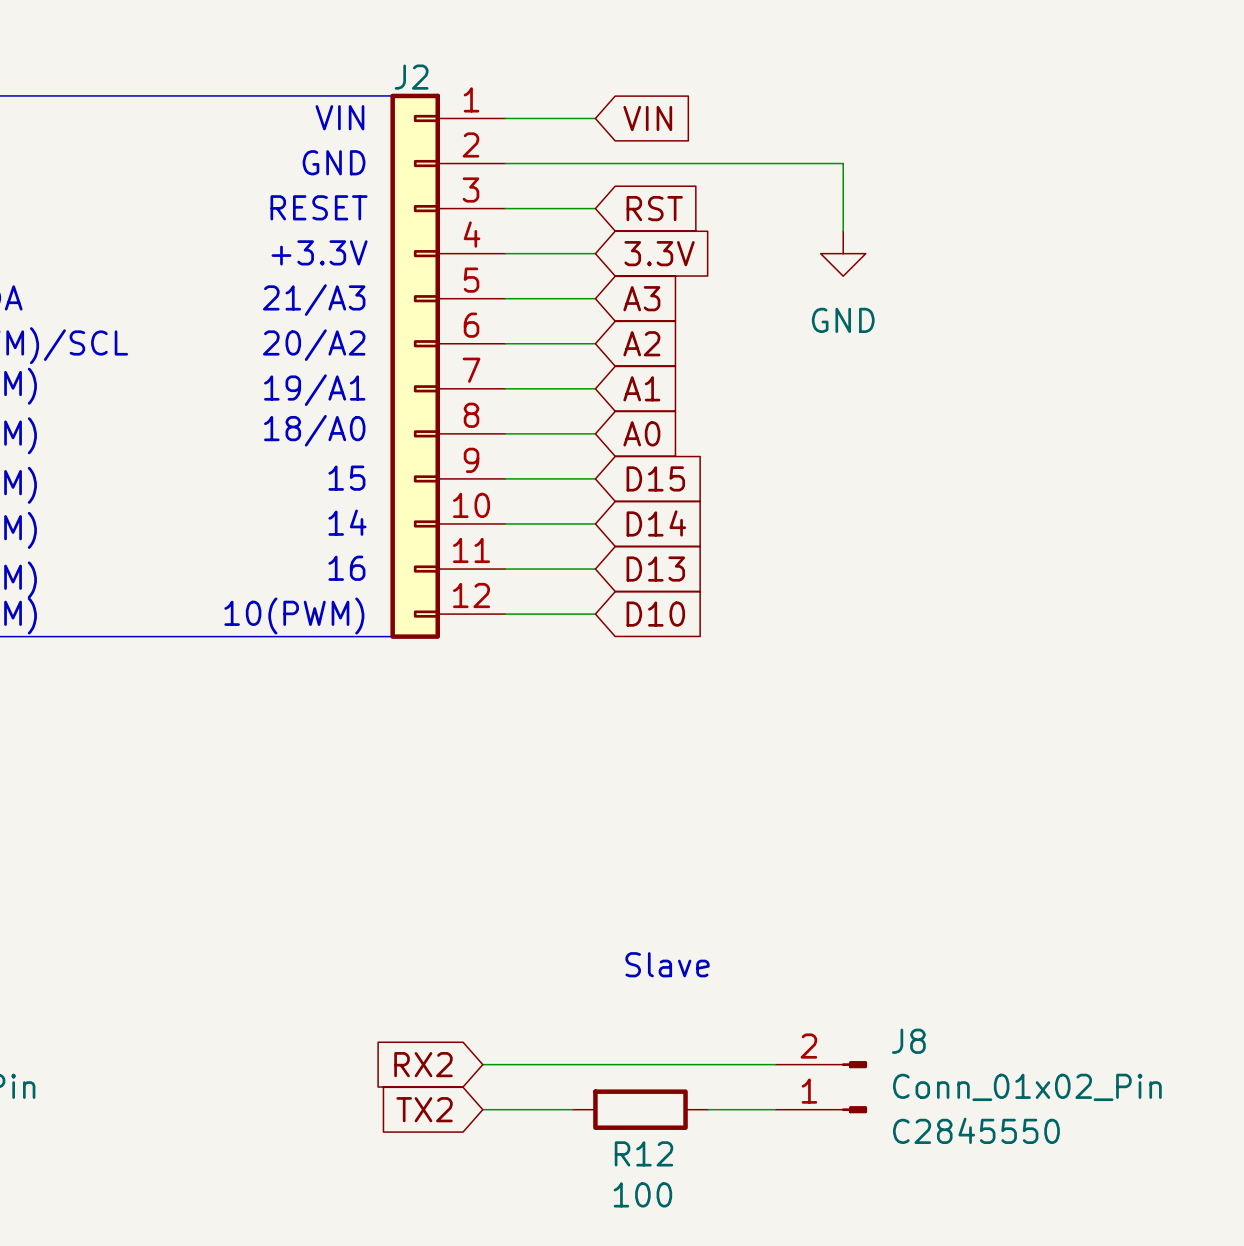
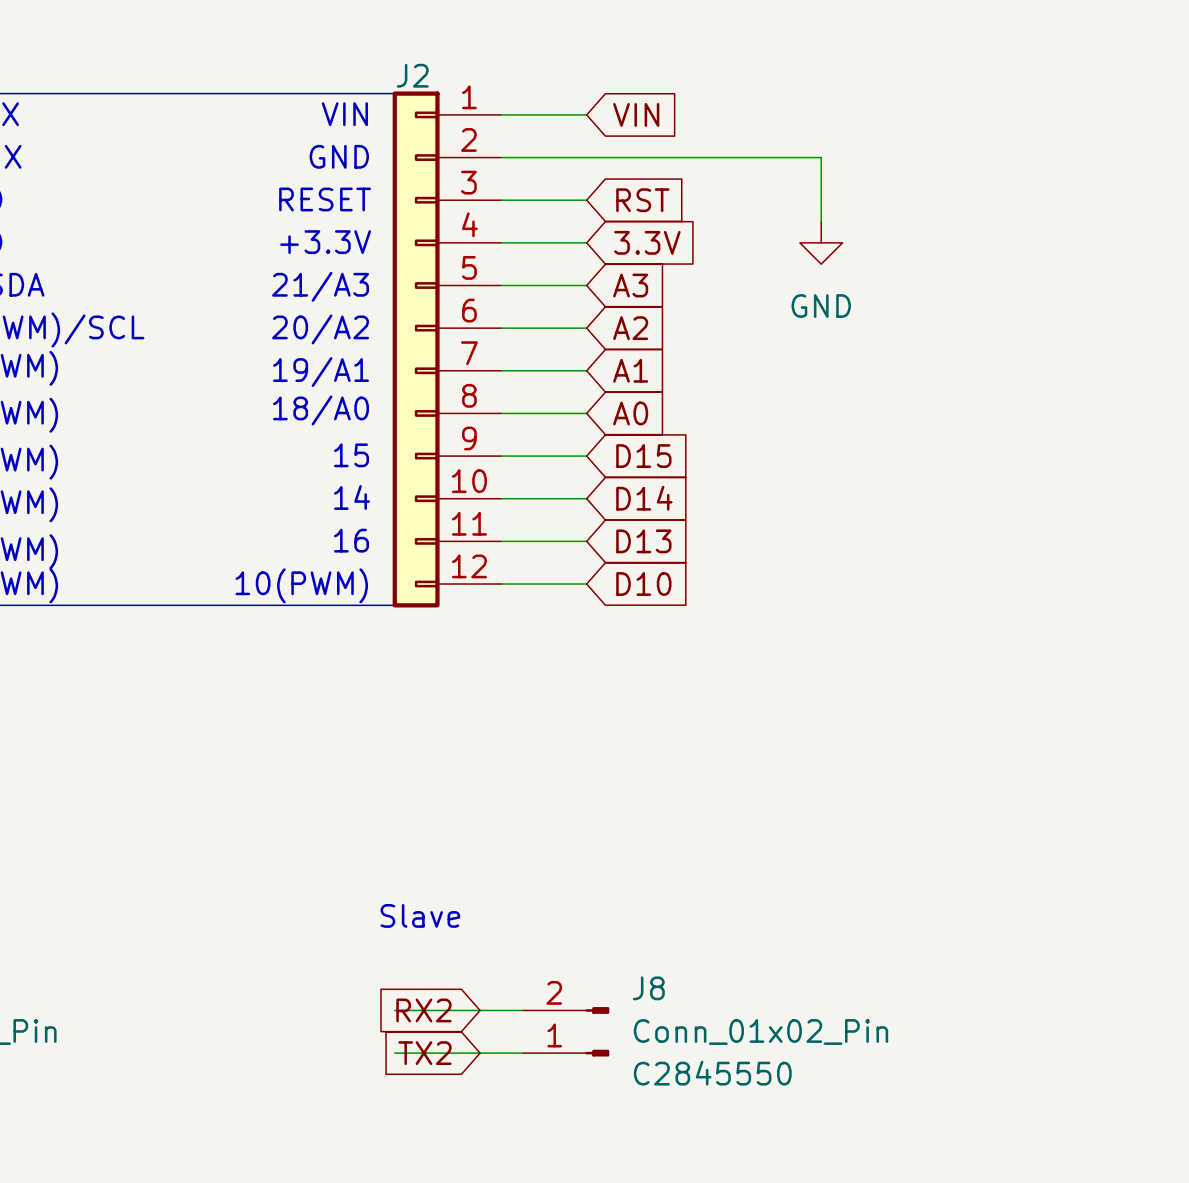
text position: Slave (667, 964) -> Slave (420, 915)
wire: none -> (394, 1010) (480, 1010)
wire: (527, 1064) (775, 1064) -> none
J8 position: (821, 1087) -> (566, 1031)
wire: none -> (394, 1053) (480, 1053)
R12: 100 (640, 1109) -> none
wire: (708, 1109) (775, 1109) -> none

